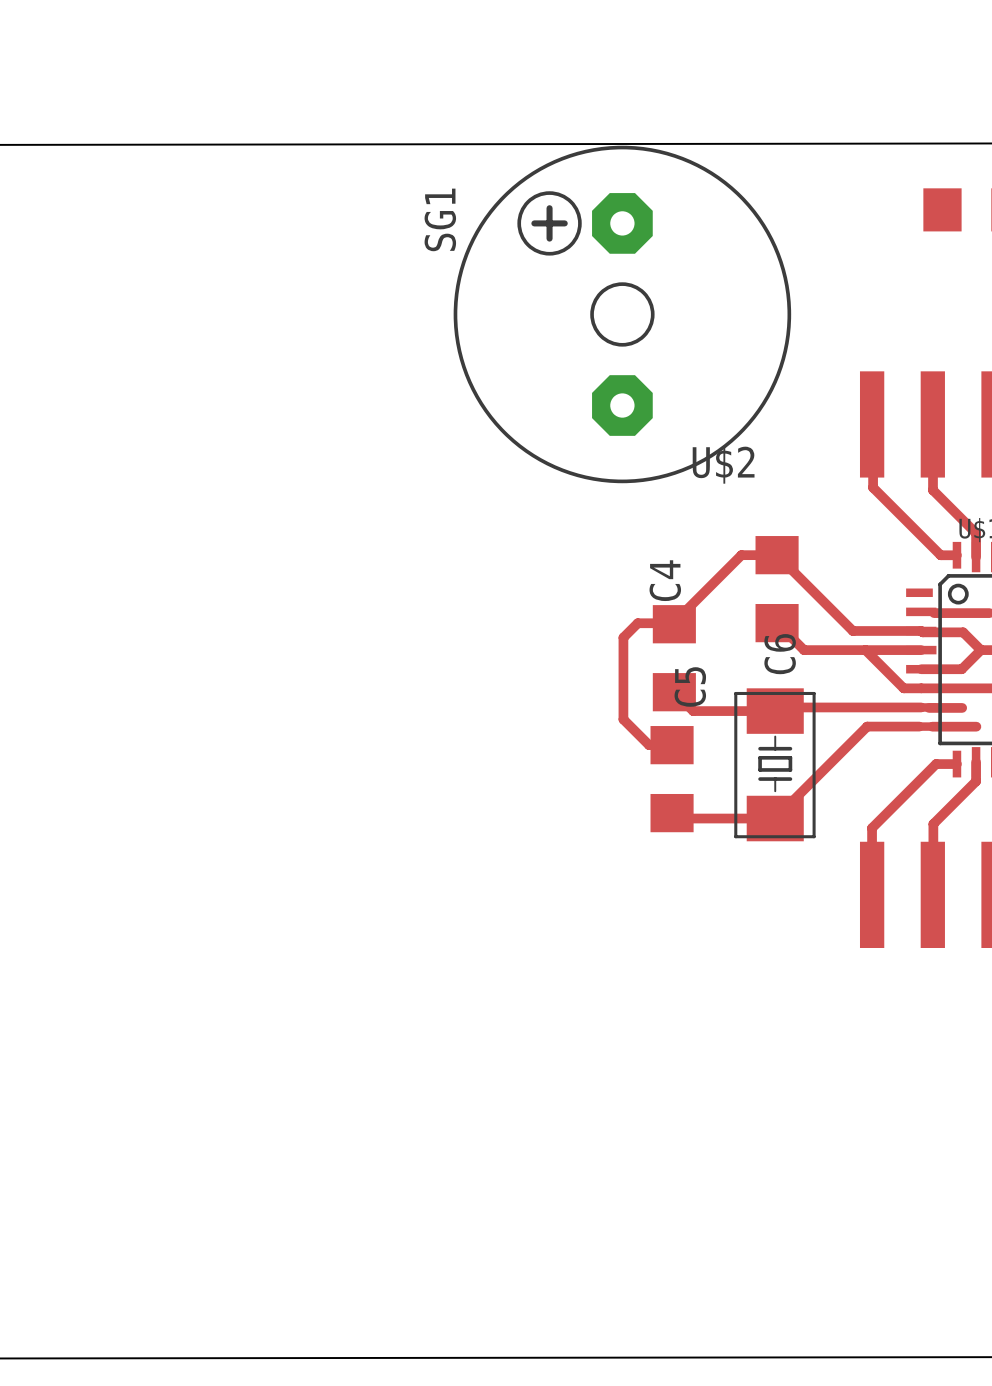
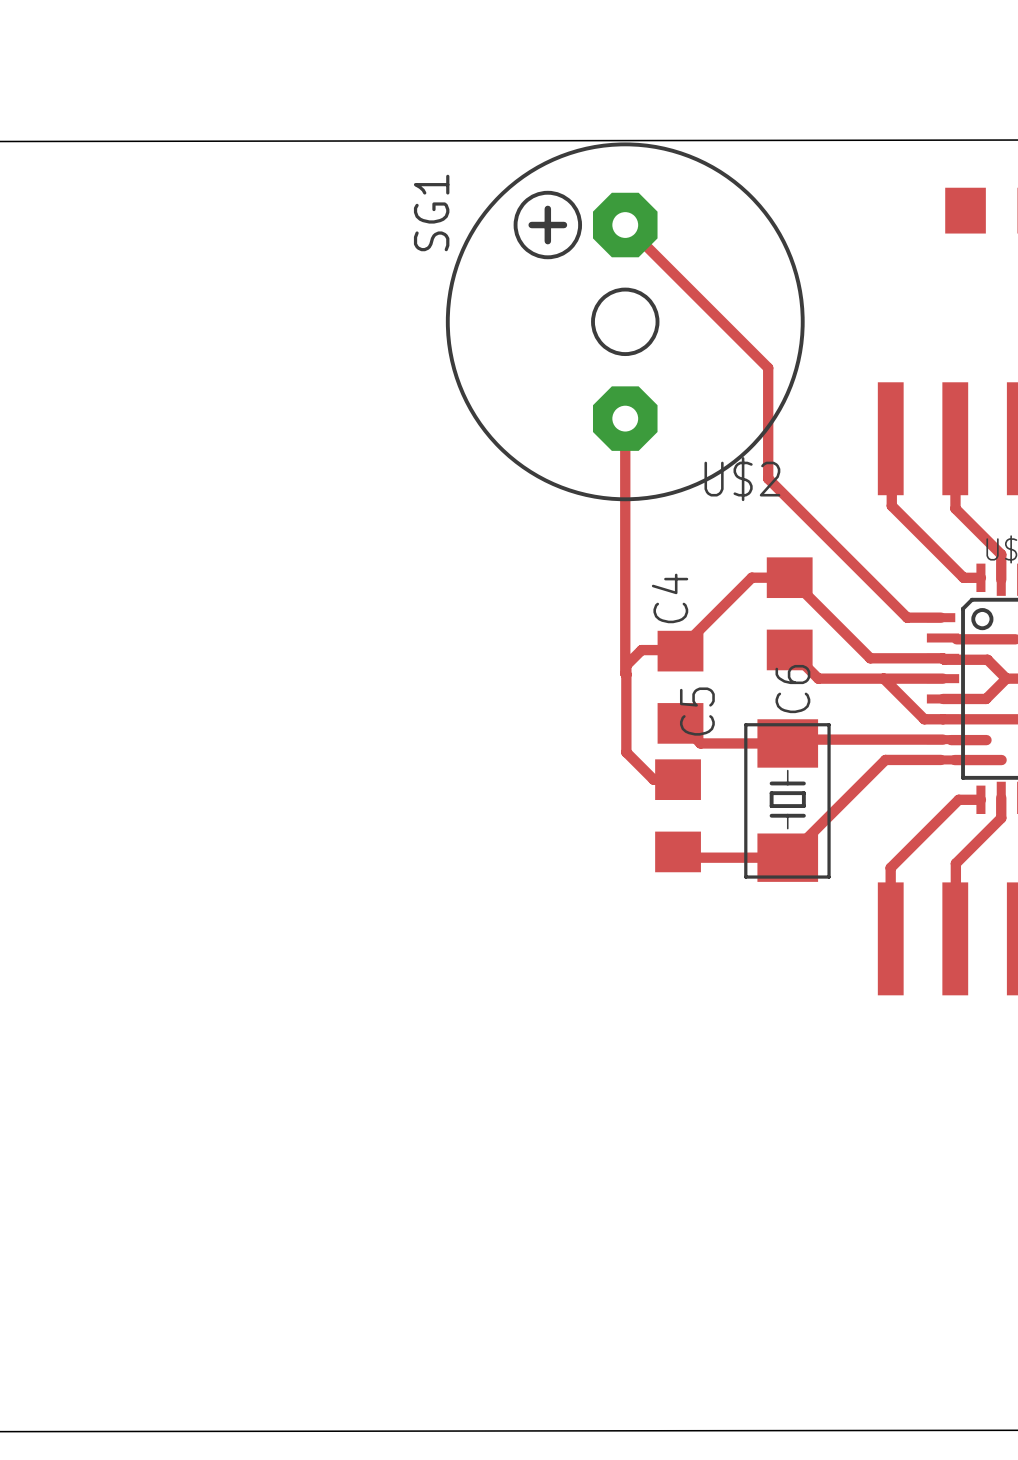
top track: none -> (625, 225) (768, 367) (768, 478) (907, 617) (941, 617)
top track: none -> (625, 418) (626, 674)

